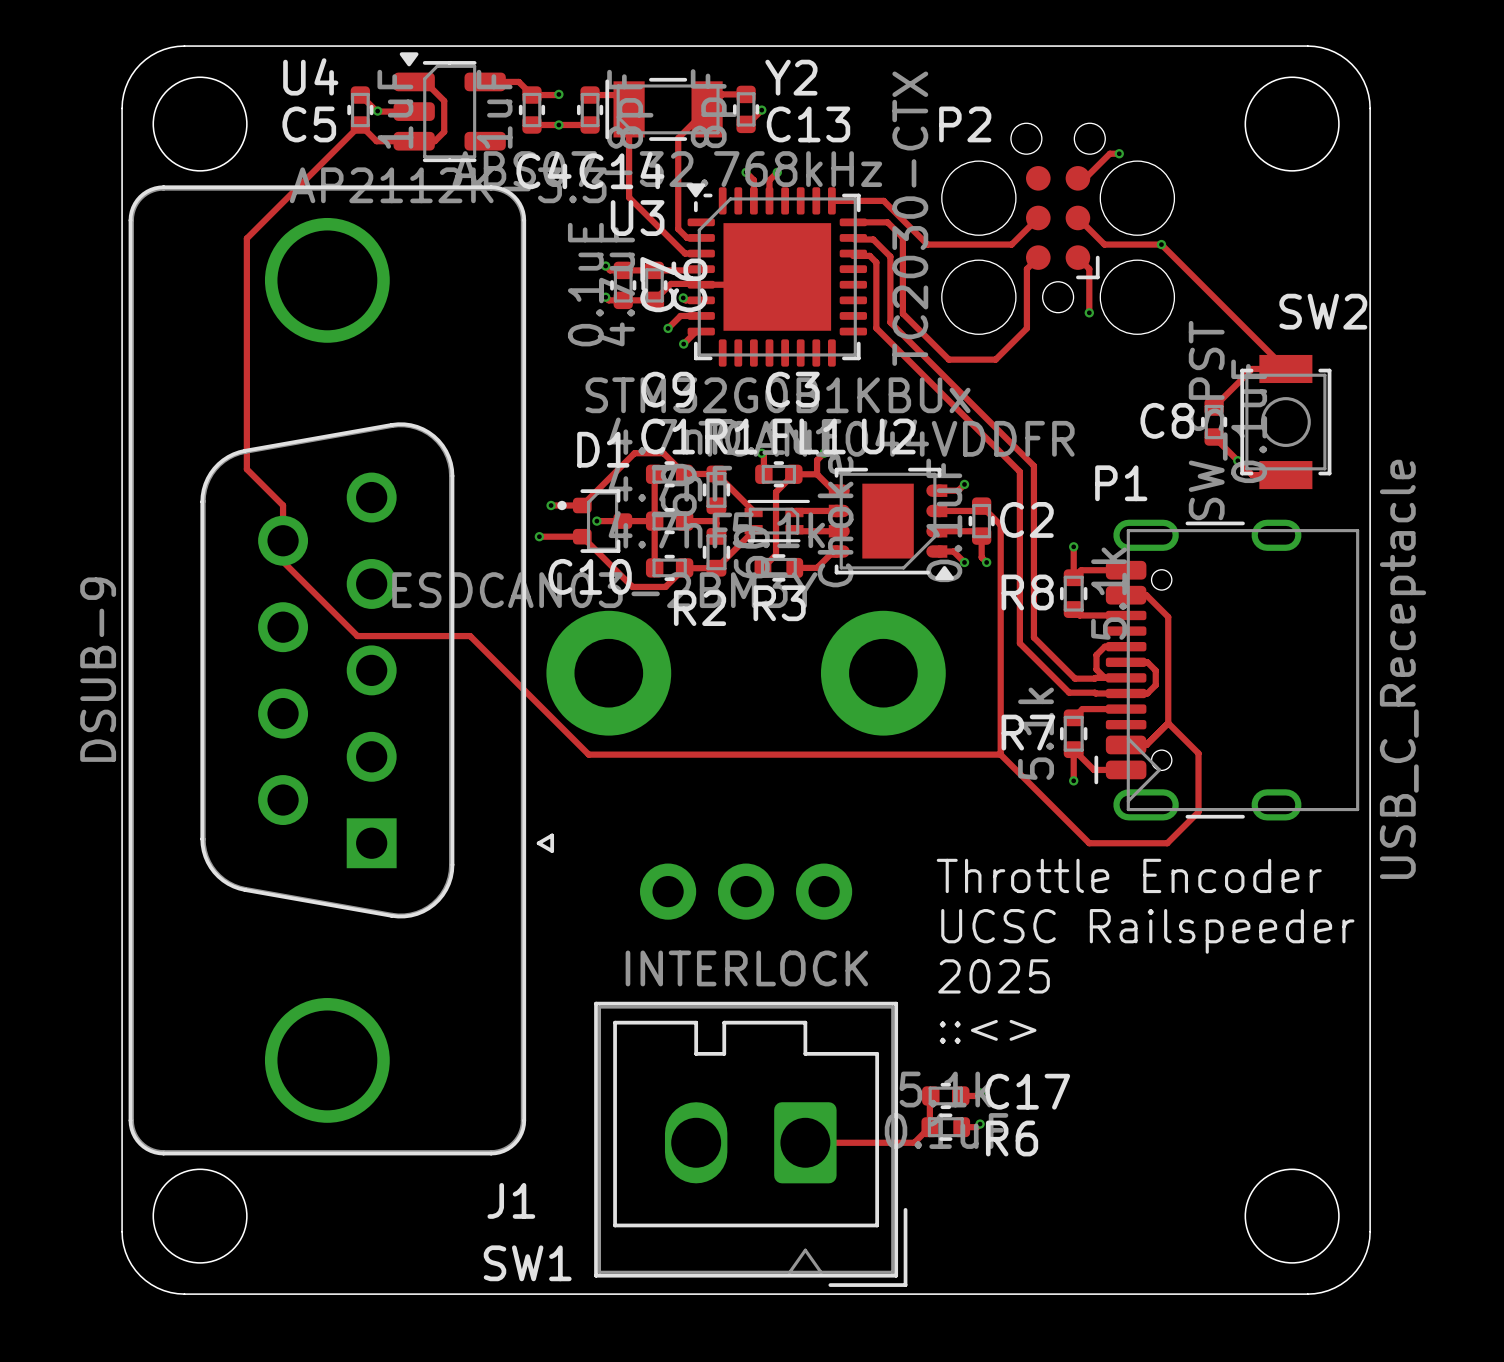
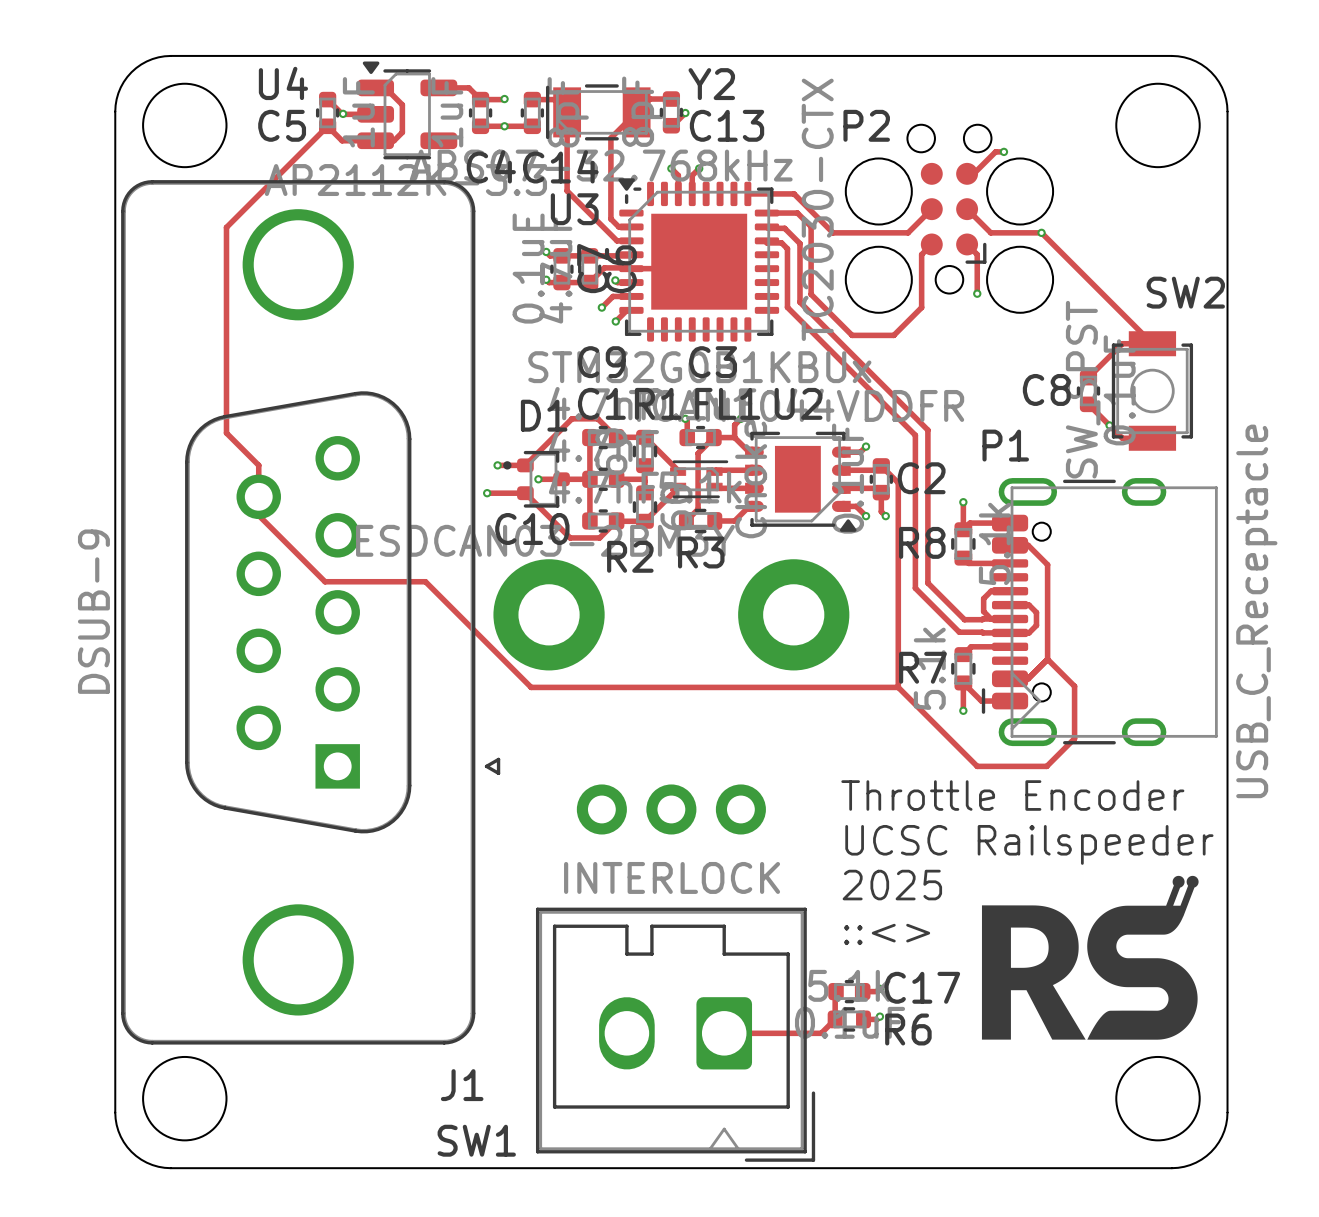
drawing: none -> [981, 875, 1199, 1040]

